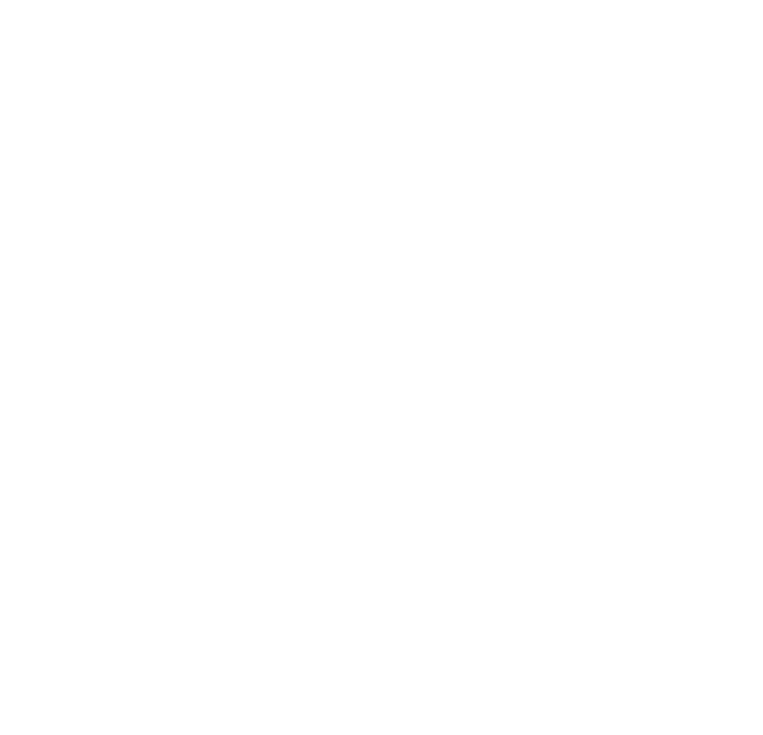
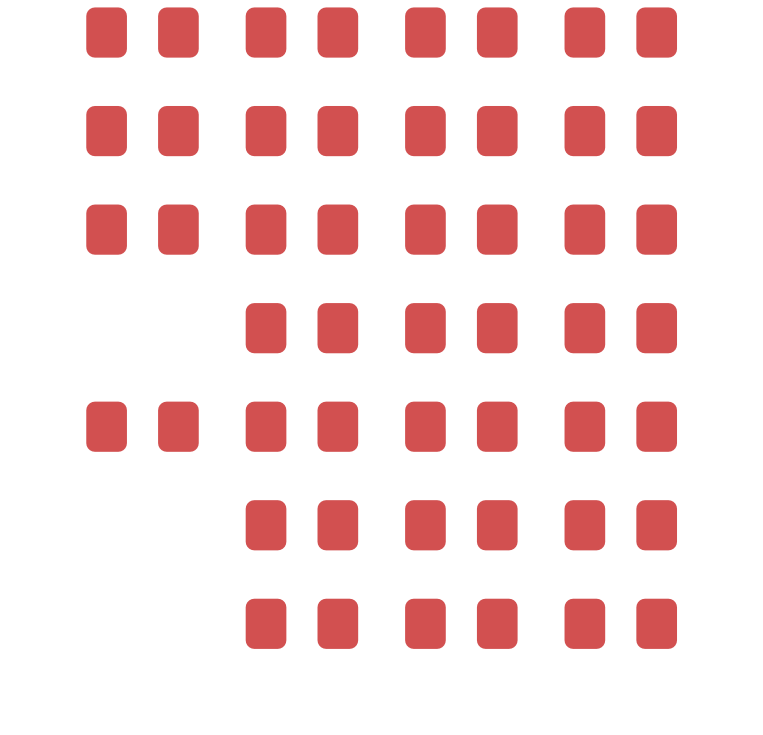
part: none -> (142, 32)
part: none -> (301, 32)
part: none -> (461, 32)
part: none -> (620, 32)
part: none -> (142, 131)
part: none -> (301, 131)
part: none -> (461, 131)
part: none -> (620, 131)
part: none -> (142, 229)
part: none -> (301, 229)
part: none -> (461, 229)
part: none -> (620, 229)
part: none -> (301, 328)
part: none -> (461, 328)
part: none -> (620, 328)
part: none -> (142, 426)
part: none -> (301, 426)
part: none -> (461, 426)
part: none -> (620, 426)
part: none -> (301, 525)
part: none -> (461, 525)
part: none -> (620, 525)
part: none -> (301, 623)
part: none -> (461, 623)
part: none -> (620, 623)

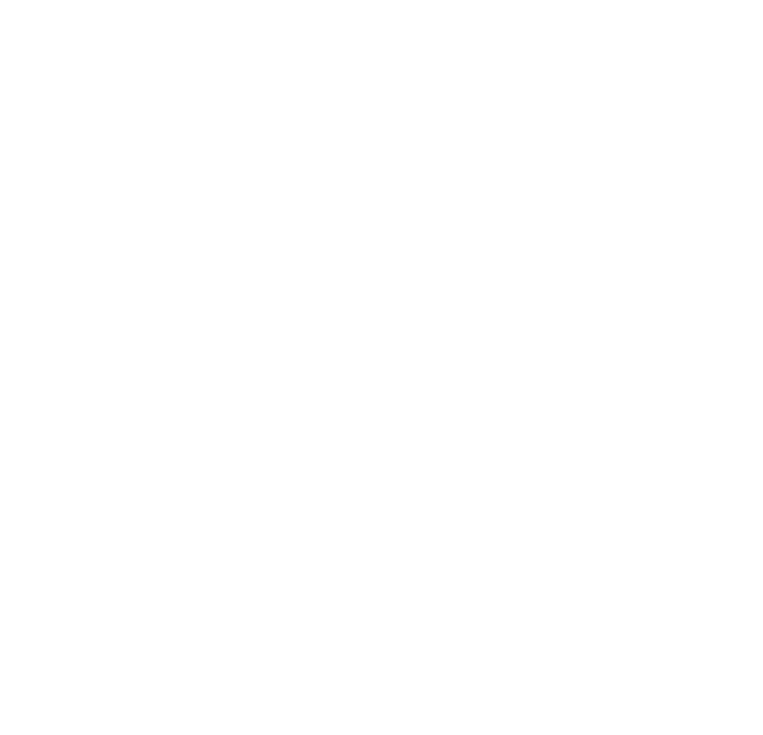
part: (142, 32) -> none
part: (301, 32) -> none
part: (461, 32) -> none
part: (620, 32) -> none
part: (142, 131) -> none
part: (301, 131) -> none
part: (461, 131) -> none
part: (620, 131) -> none
part: (142, 229) -> none
part: (301, 229) -> none
part: (461, 229) -> none
part: (620, 229) -> none
part: (301, 328) -> none
part: (461, 328) -> none
part: (620, 328) -> none
part: (142, 426) -> none
part: (301, 426) -> none
part: (461, 426) -> none
part: (620, 426) -> none
part: (301, 525) -> none
part: (461, 525) -> none
part: (620, 525) -> none
part: (301, 623) -> none
part: (461, 623) -> none
part: (620, 623) -> none

